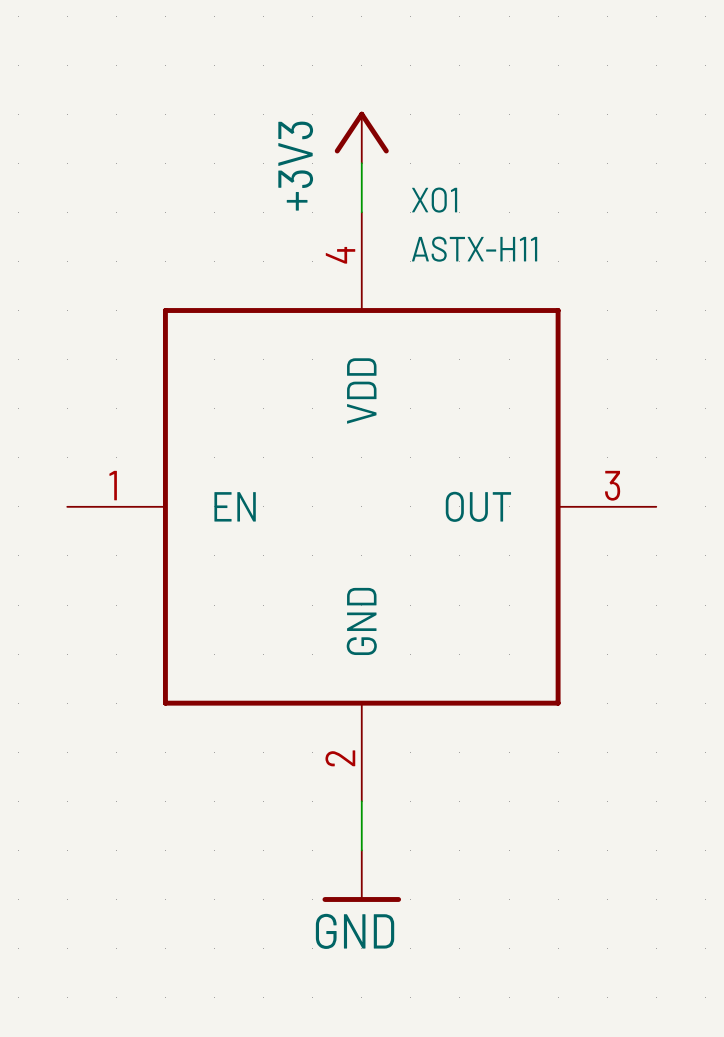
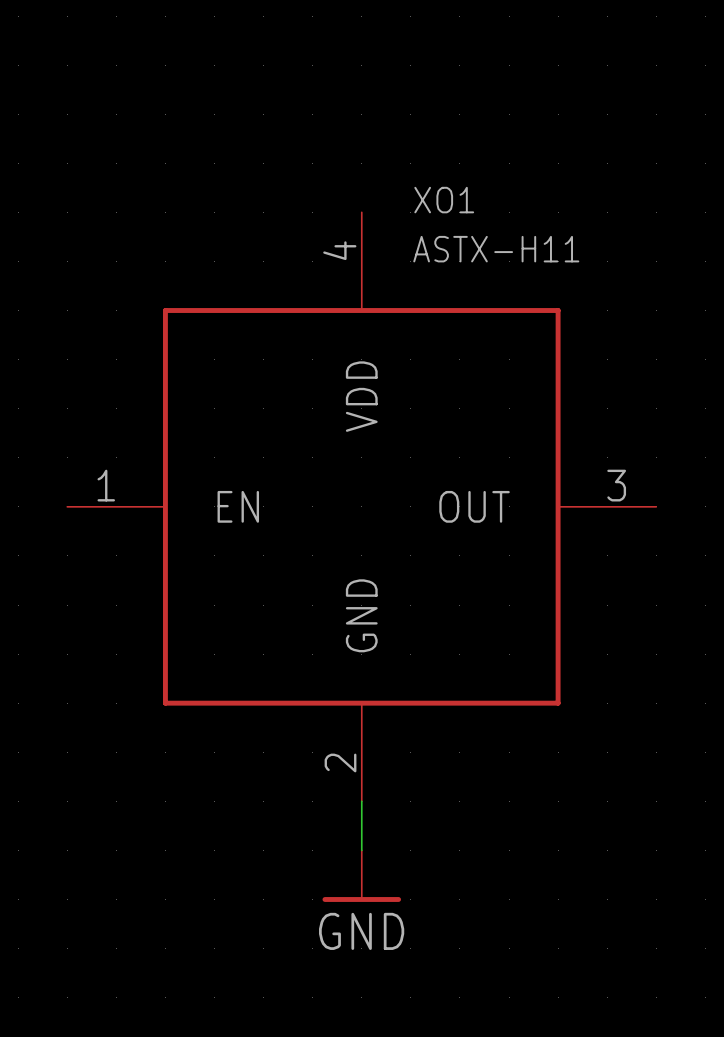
power symbol: +3V3 (361, 137) -> none
wire: (361, 163) (361, 212) -> none

